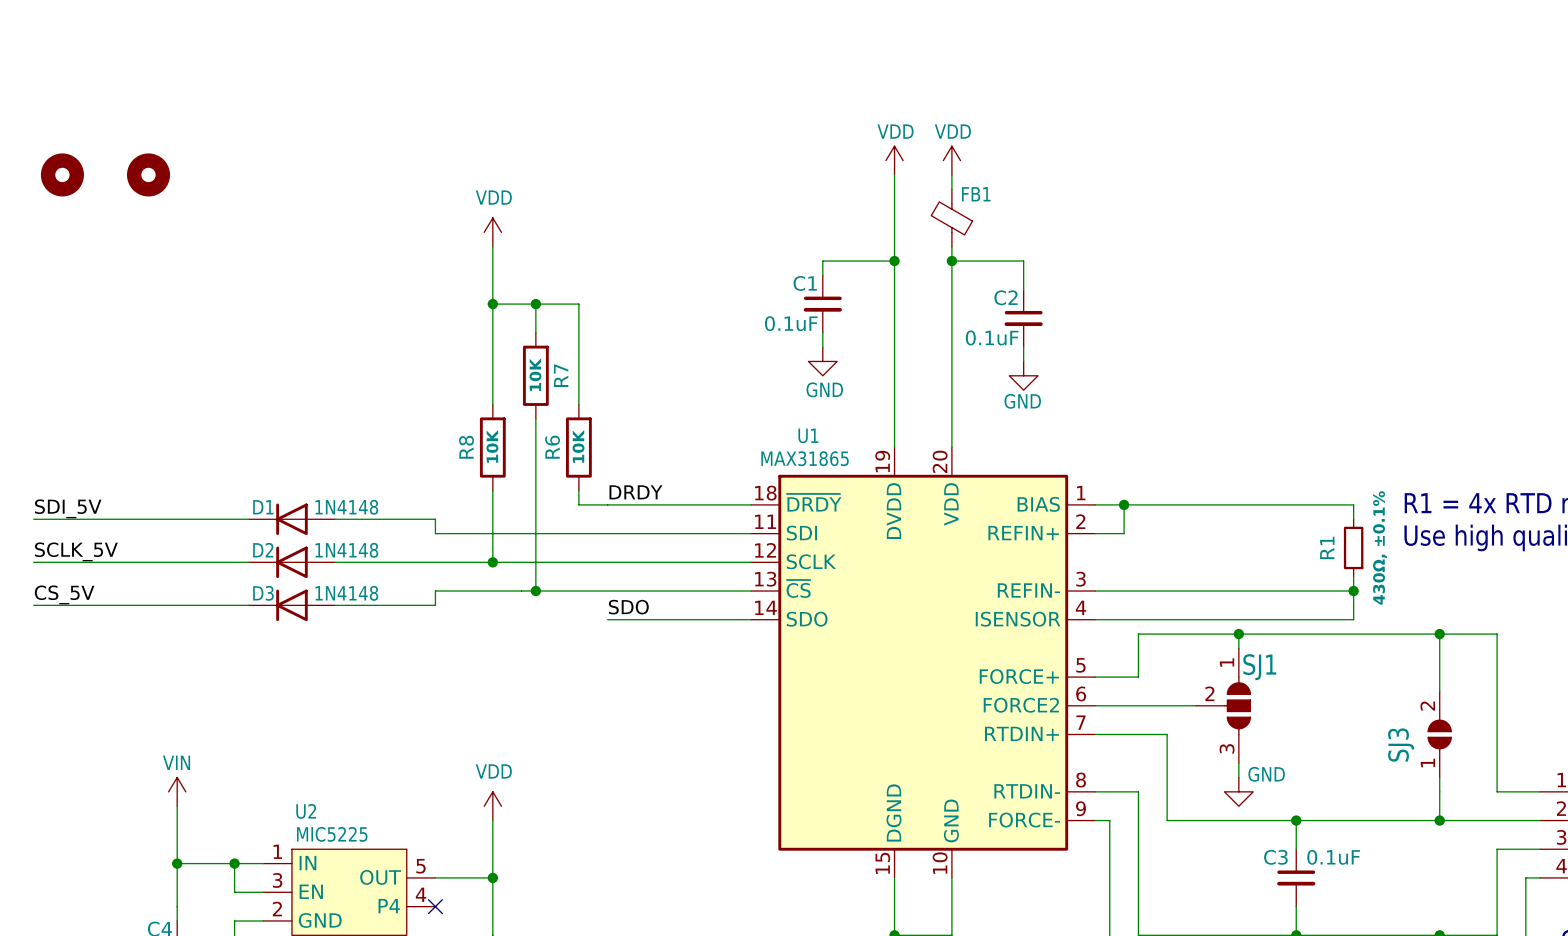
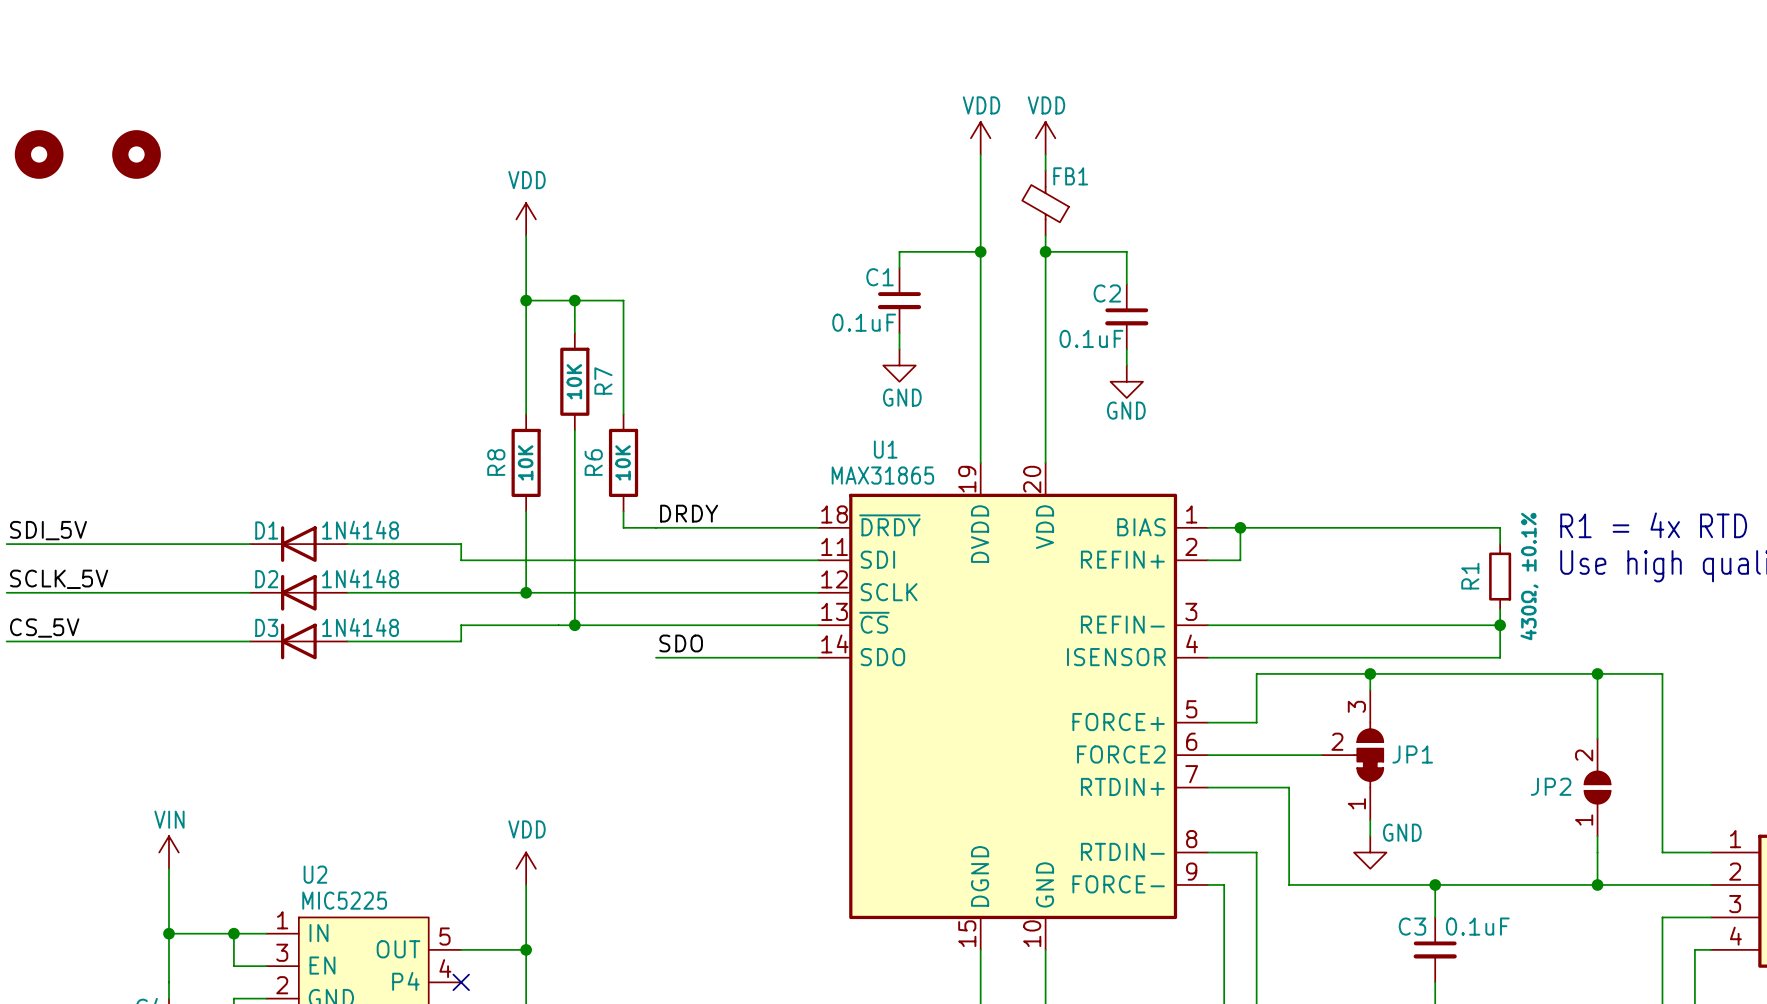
SJ1: (1223, 705) -> none
JP1: none -> (1352, 755)
SJ3 name: SJ3 (1401, 745) -> JP2 (1551, 786)

